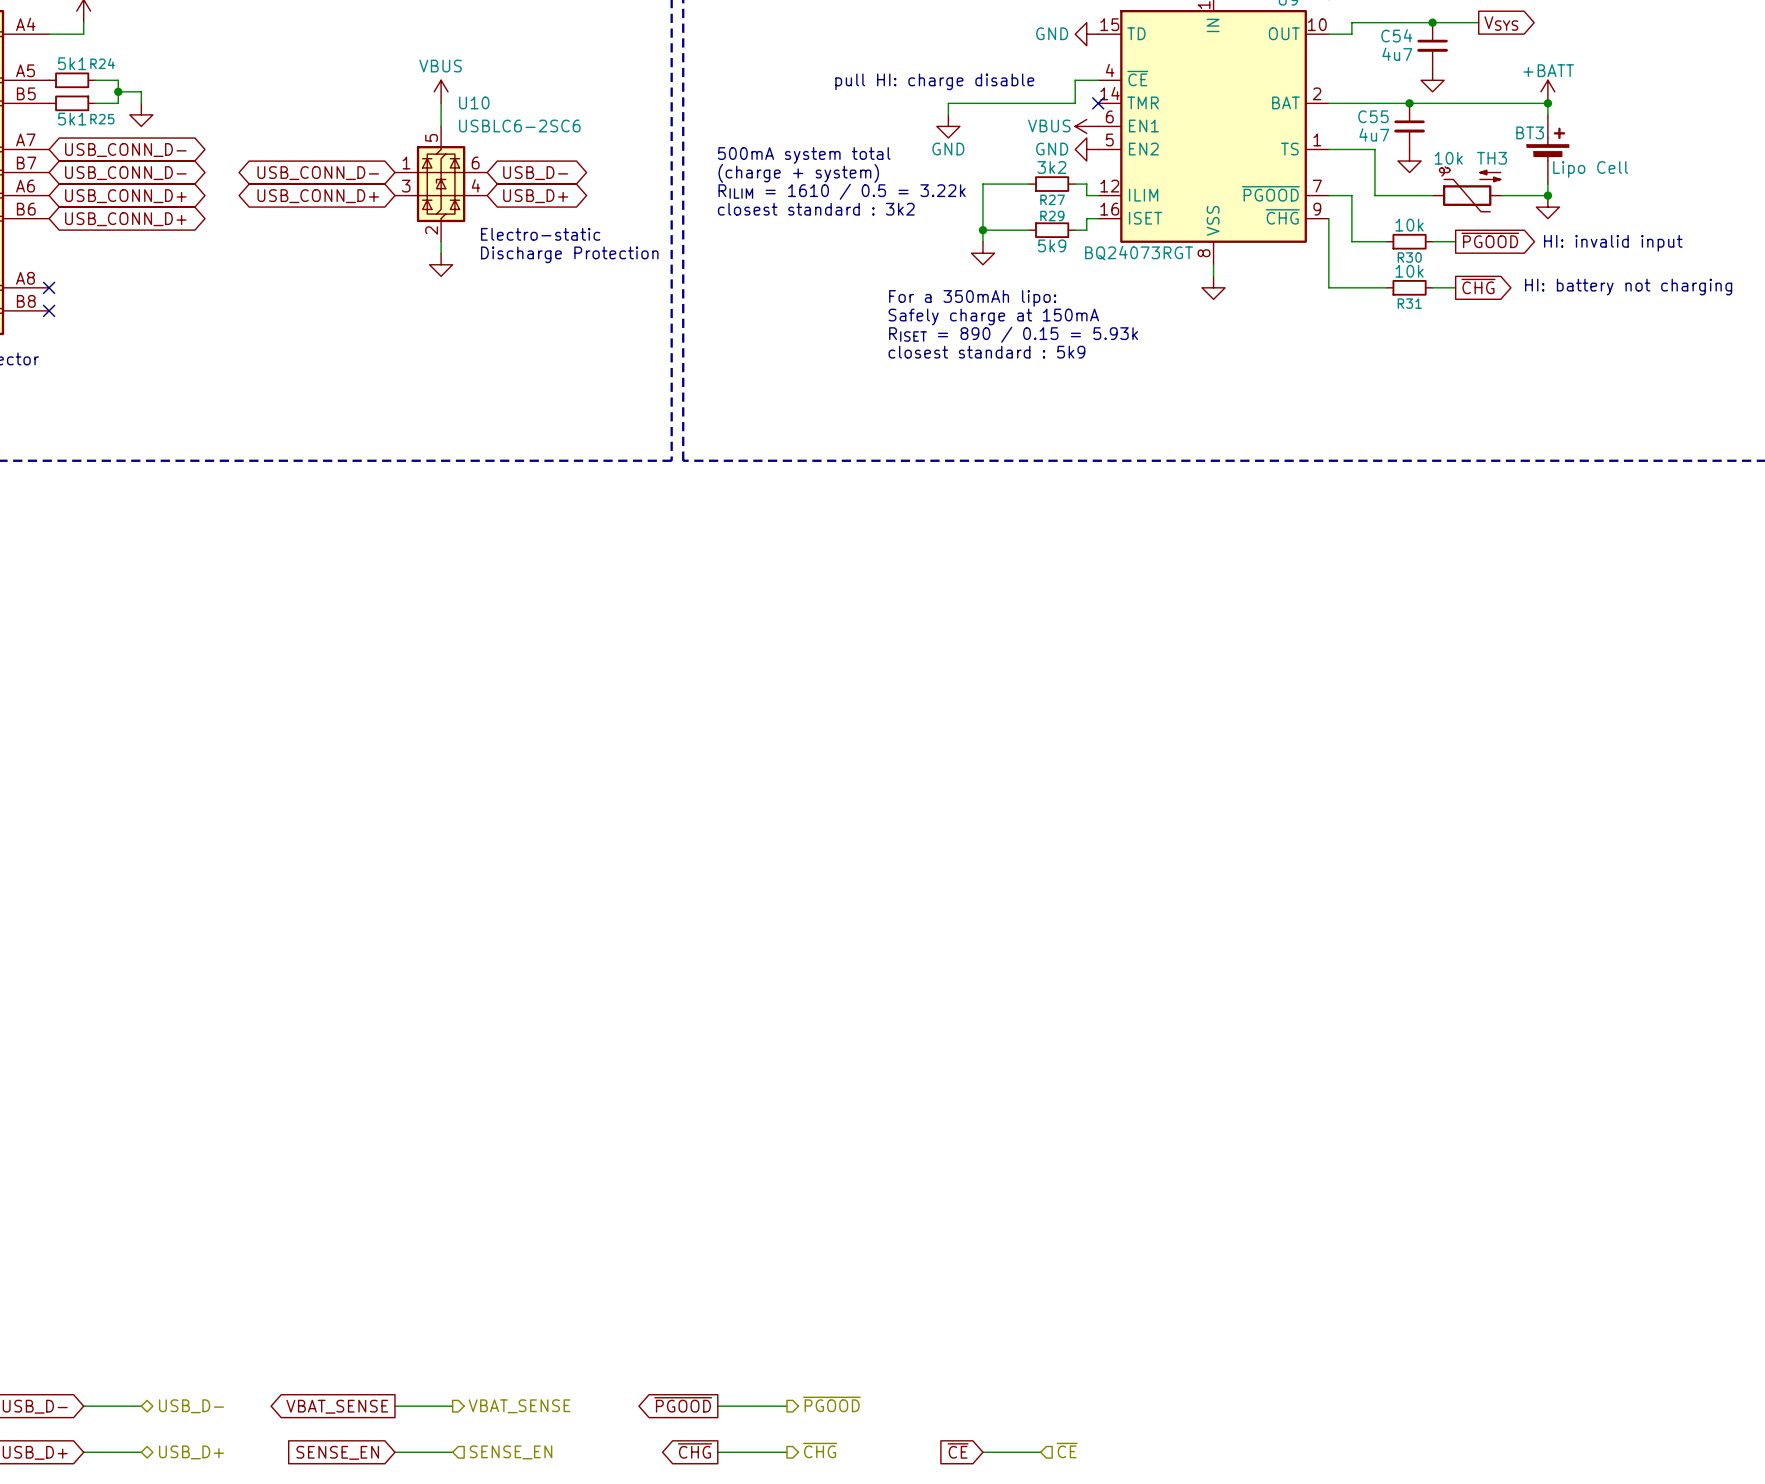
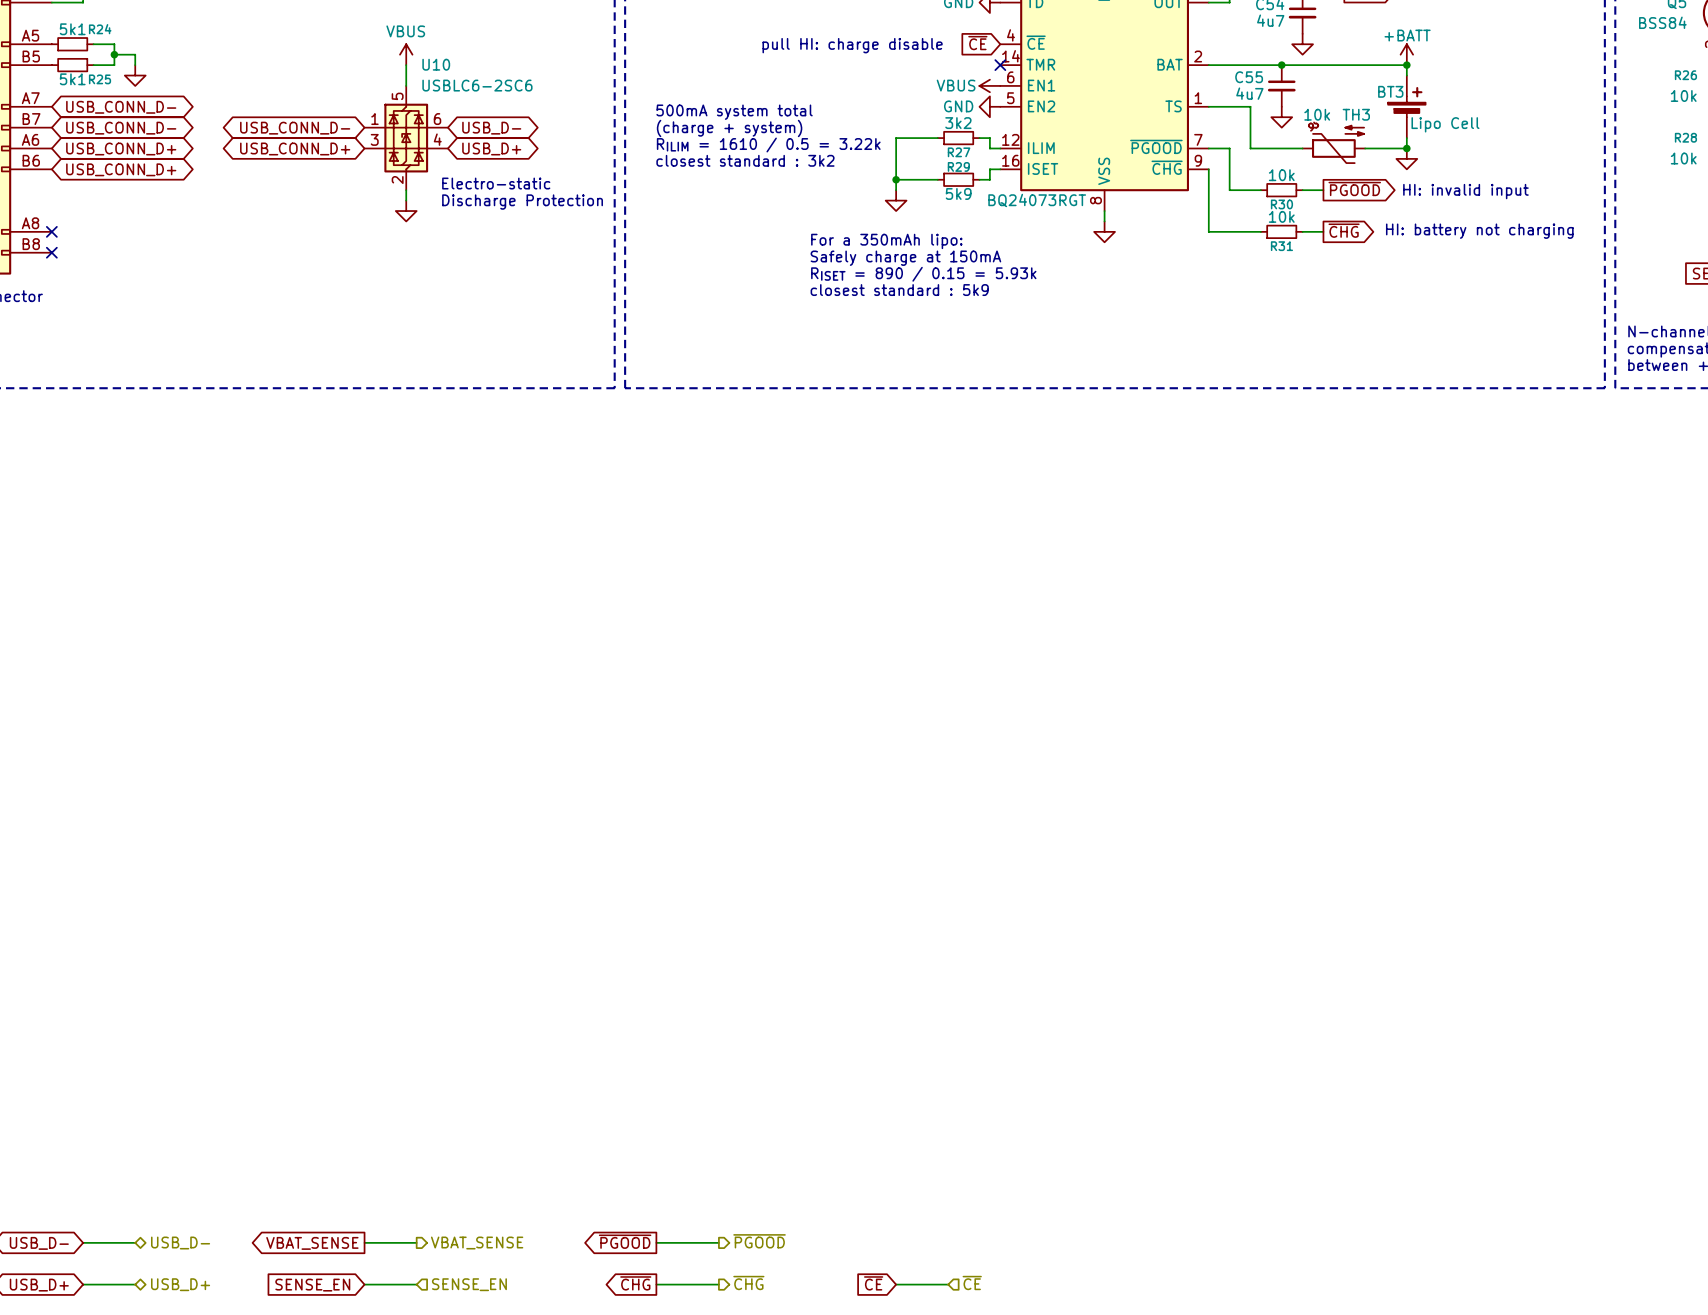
global label: none -> ~{CE} (977, 43)
wire: (1098, 80) (1075, 80) (1075, 103) (948, 103) (948, 114) -> none
power symbol: GND (948, 126) -> none

